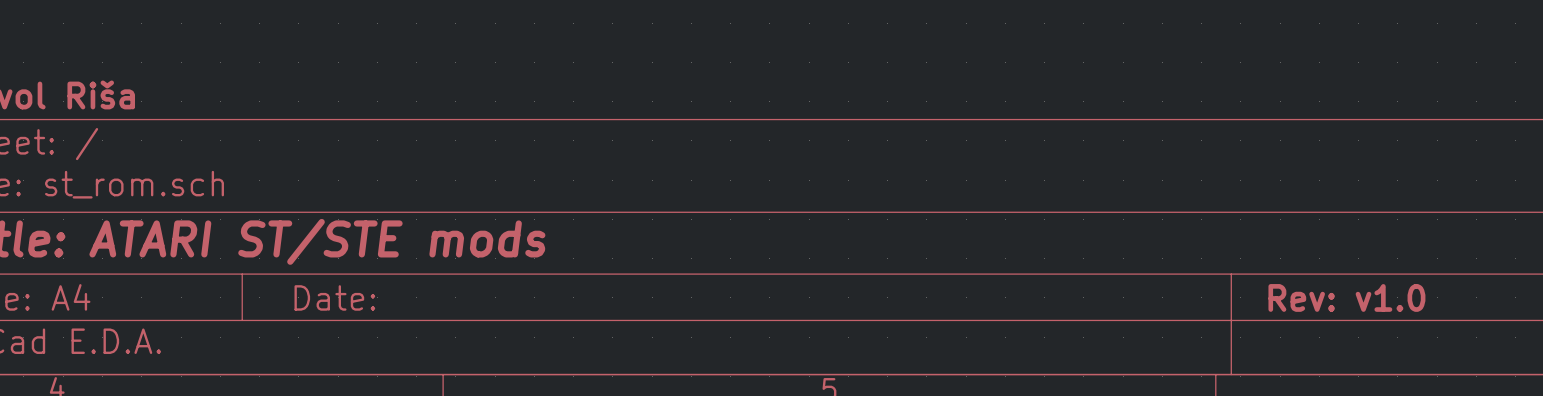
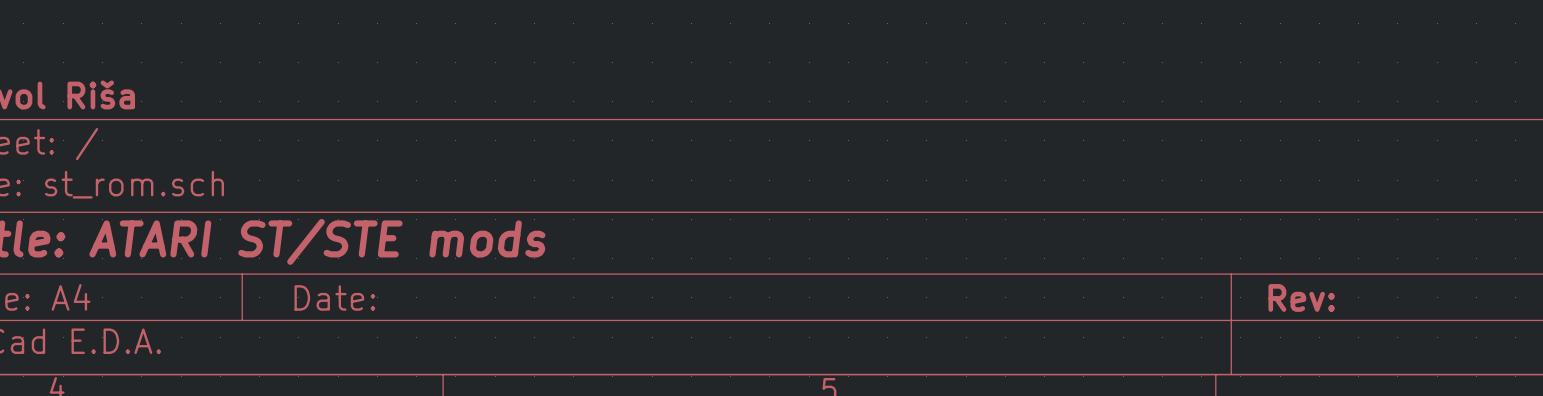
title block: Rev: v1.0 (1346, 297) -> Rev: (1301, 297)

